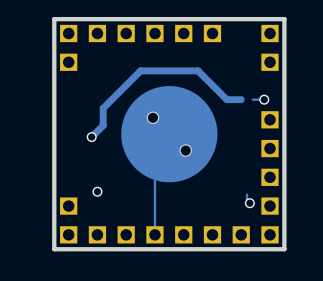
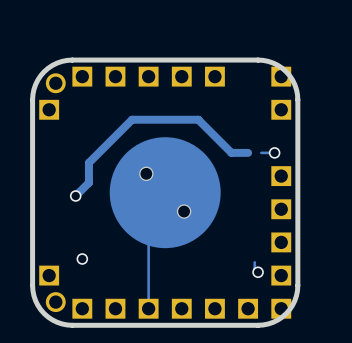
board edge: (88, 19) (54, 19) (54, 53) -> (72, 60) (57, 63) (44, 71) (35, 84) (32, 99)
board edge: (249, 19) (284, 19) (284, 53) -> (258, 60) (273, 63) (286, 71) (294, 84) (297, 99)
part footprint: [60, 24, 78, 43] -> [45, 73, 66, 94]
board edge: (54, 214) (54, 249) (88, 249) -> (32, 285) (35, 300) (44, 313) (57, 322) (72, 325)
board edge: (284, 214) (284, 249) (249, 249) -> (297, 285) (294, 300) (286, 313) (273, 322) (258, 325)
part footprint: [60, 226, 78, 244] -> [45, 292, 66, 313]

